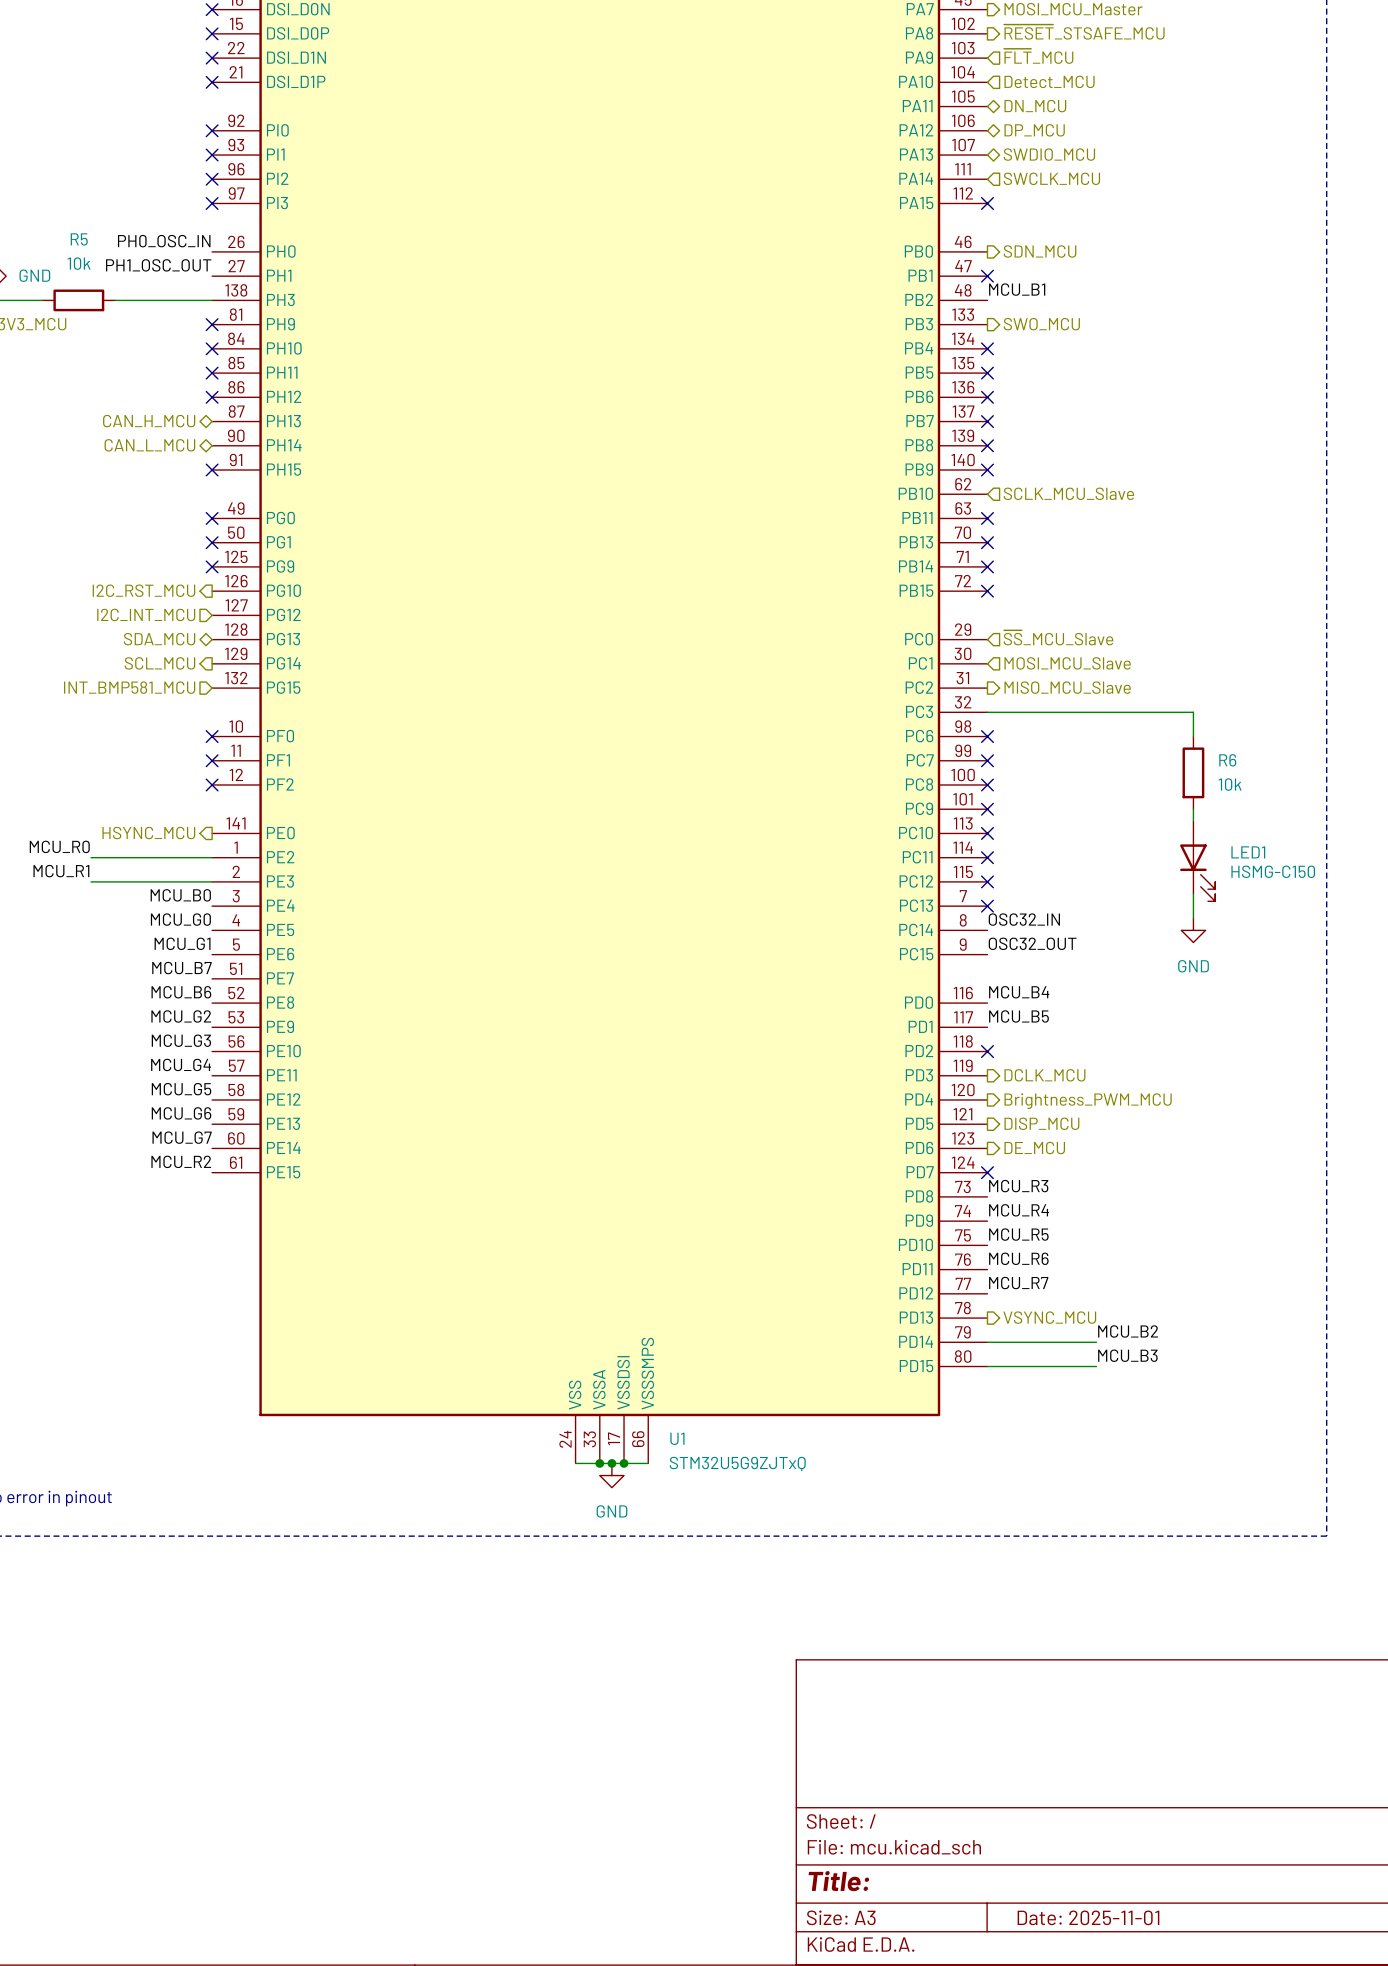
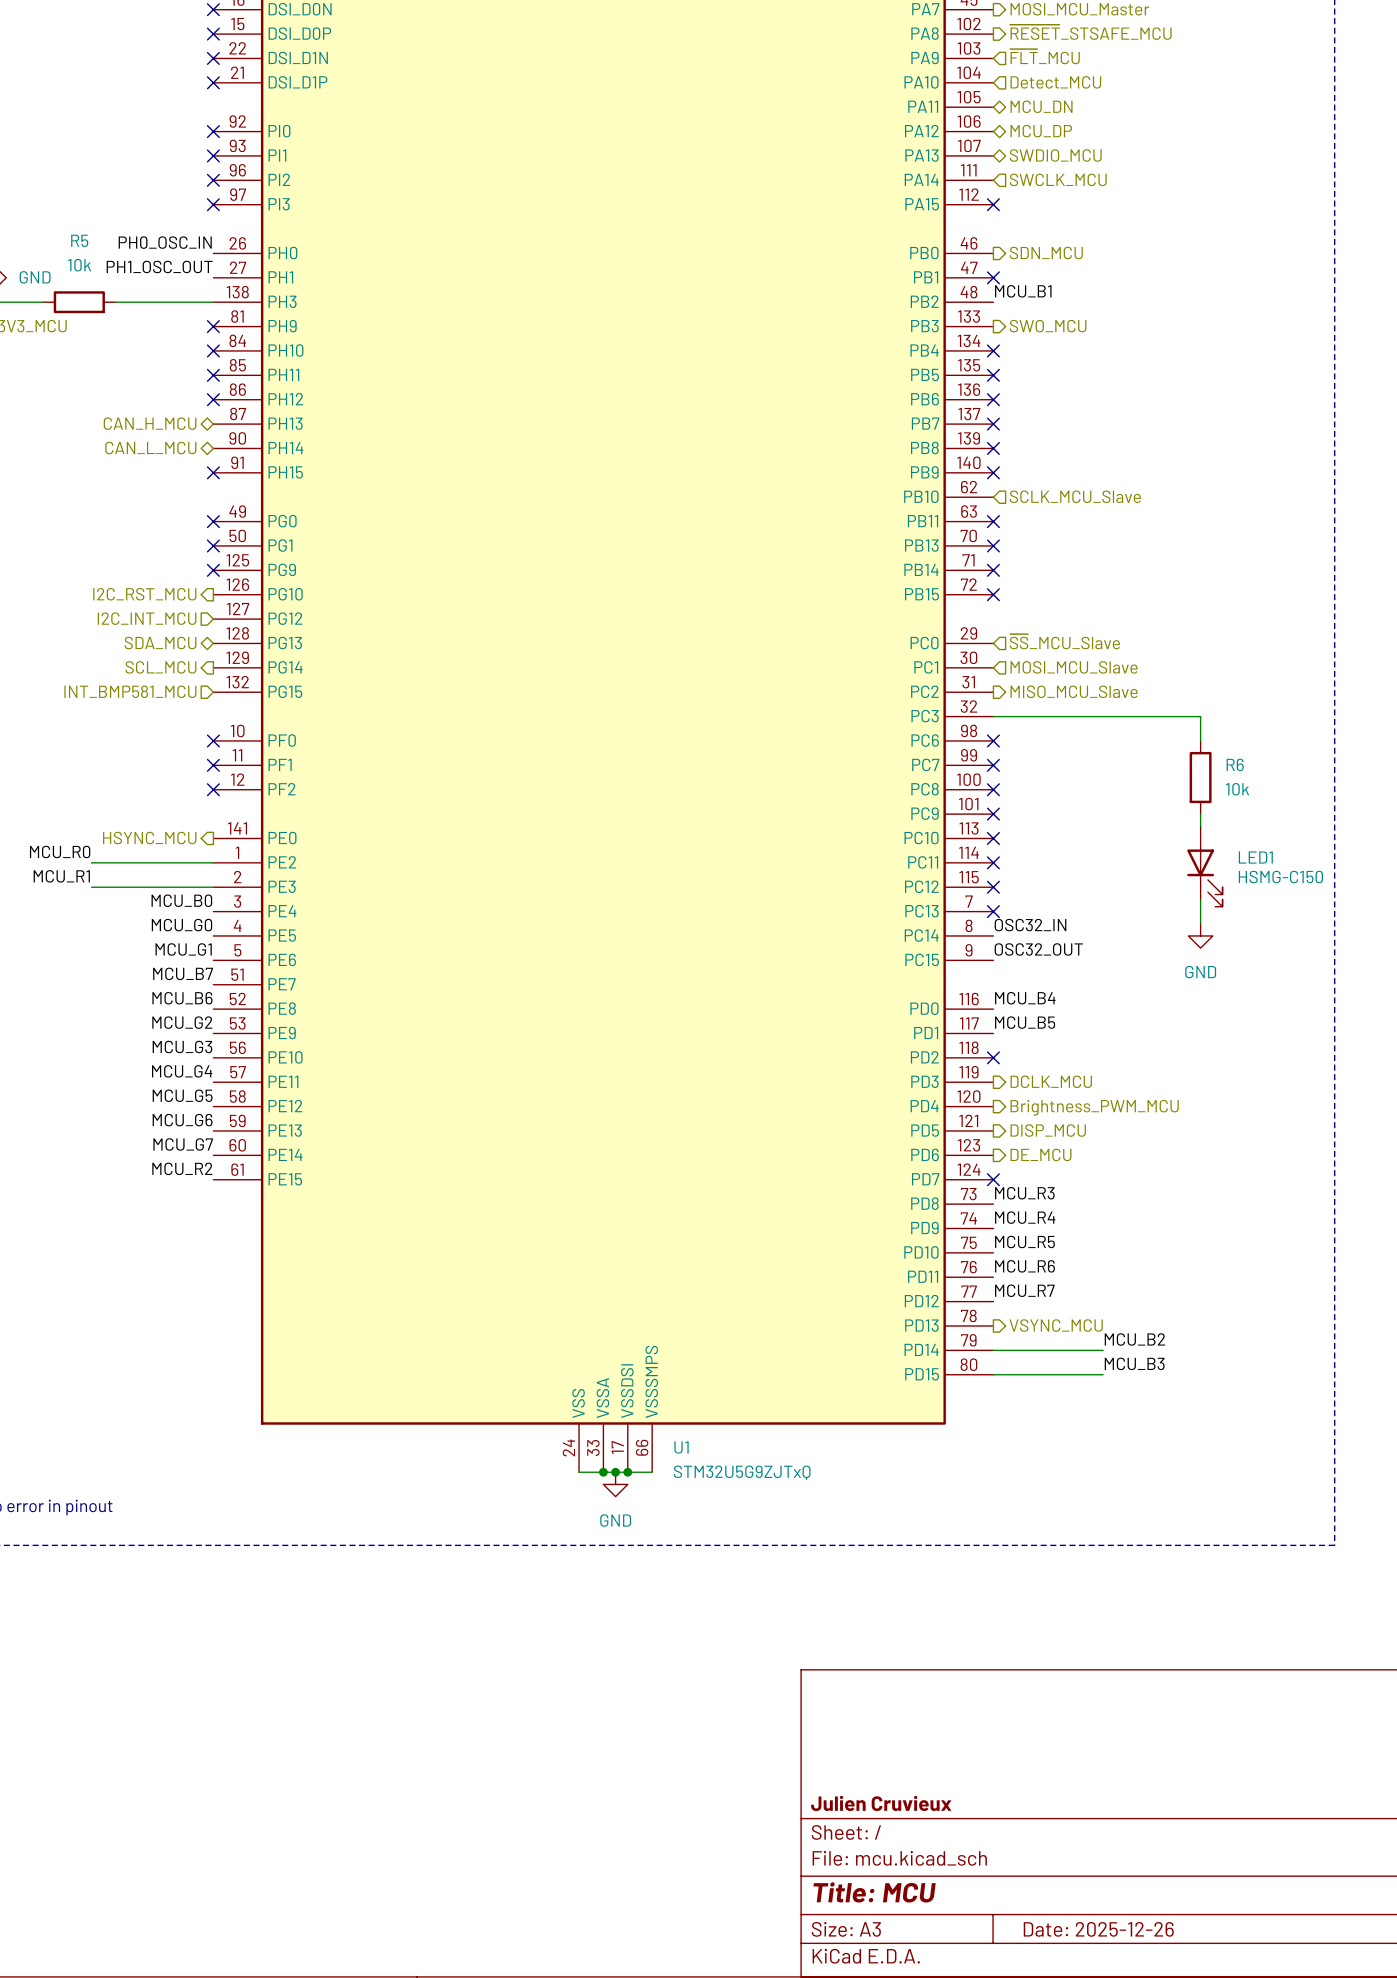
hierarchical label: DN_MCU (1035, 106) -> MCU_DN (1041, 106)
hierarchical label: DP_MCU (1034, 130) -> MCU_DP (1041, 131)
title block: none -> Julien Cruvieux (881, 1803)
title block: Title: (838, 1881) -> Title: MCU (874, 1892)
title block: Date: 2025-11-01 (1088, 1917) -> Date: 2025-12-26 (1098, 1929)

